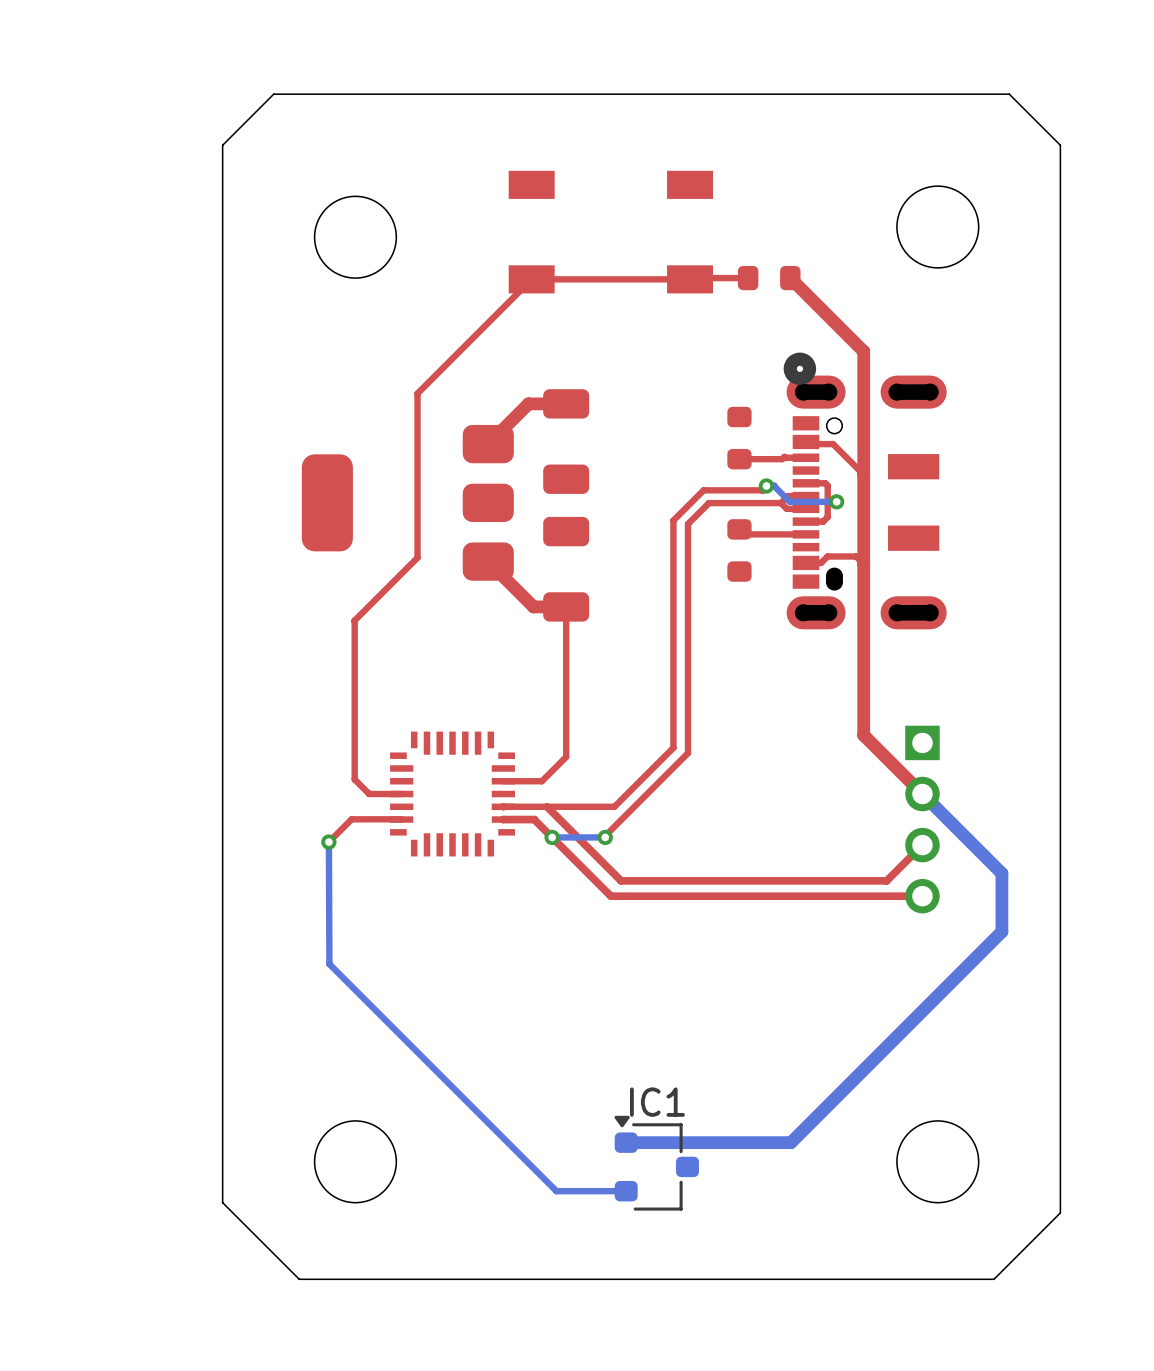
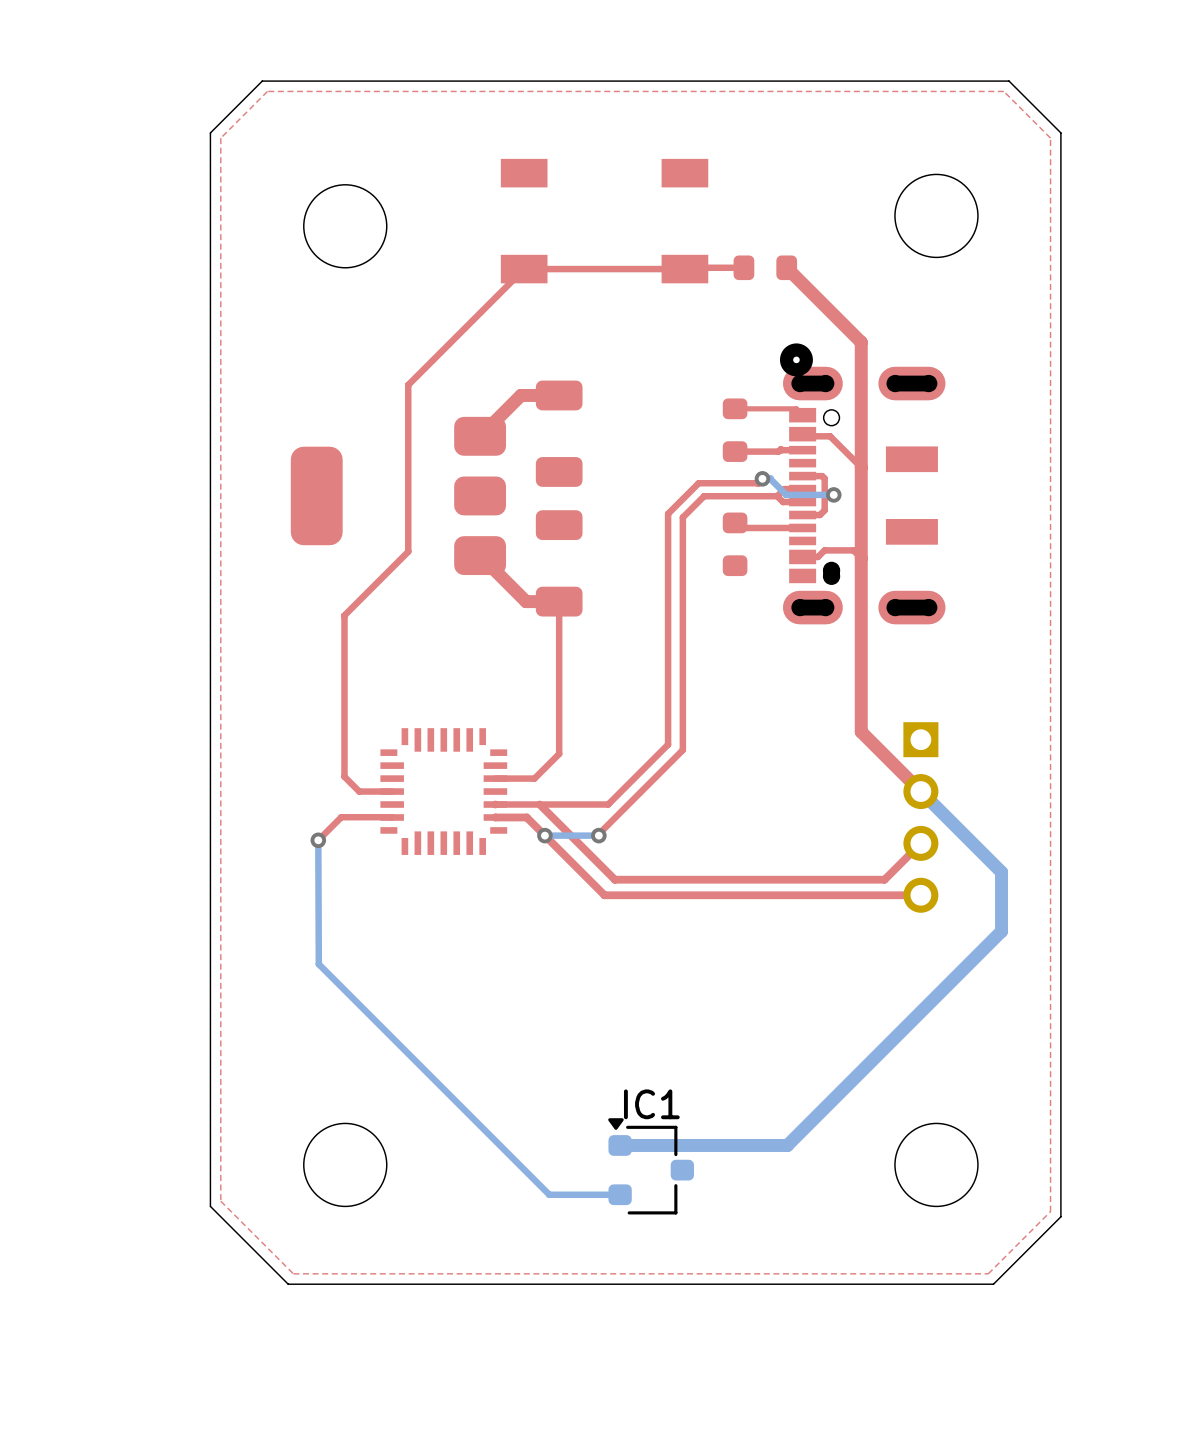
top zone outline: none -> (1003, 91) (267, 91) (220, 138) (220, 1201) (293, 1273) (988, 1273) (1050, 1211) (1050, 138) (1003, 91)
top track: none -> (735, 408) (796, 408) (802, 415)

